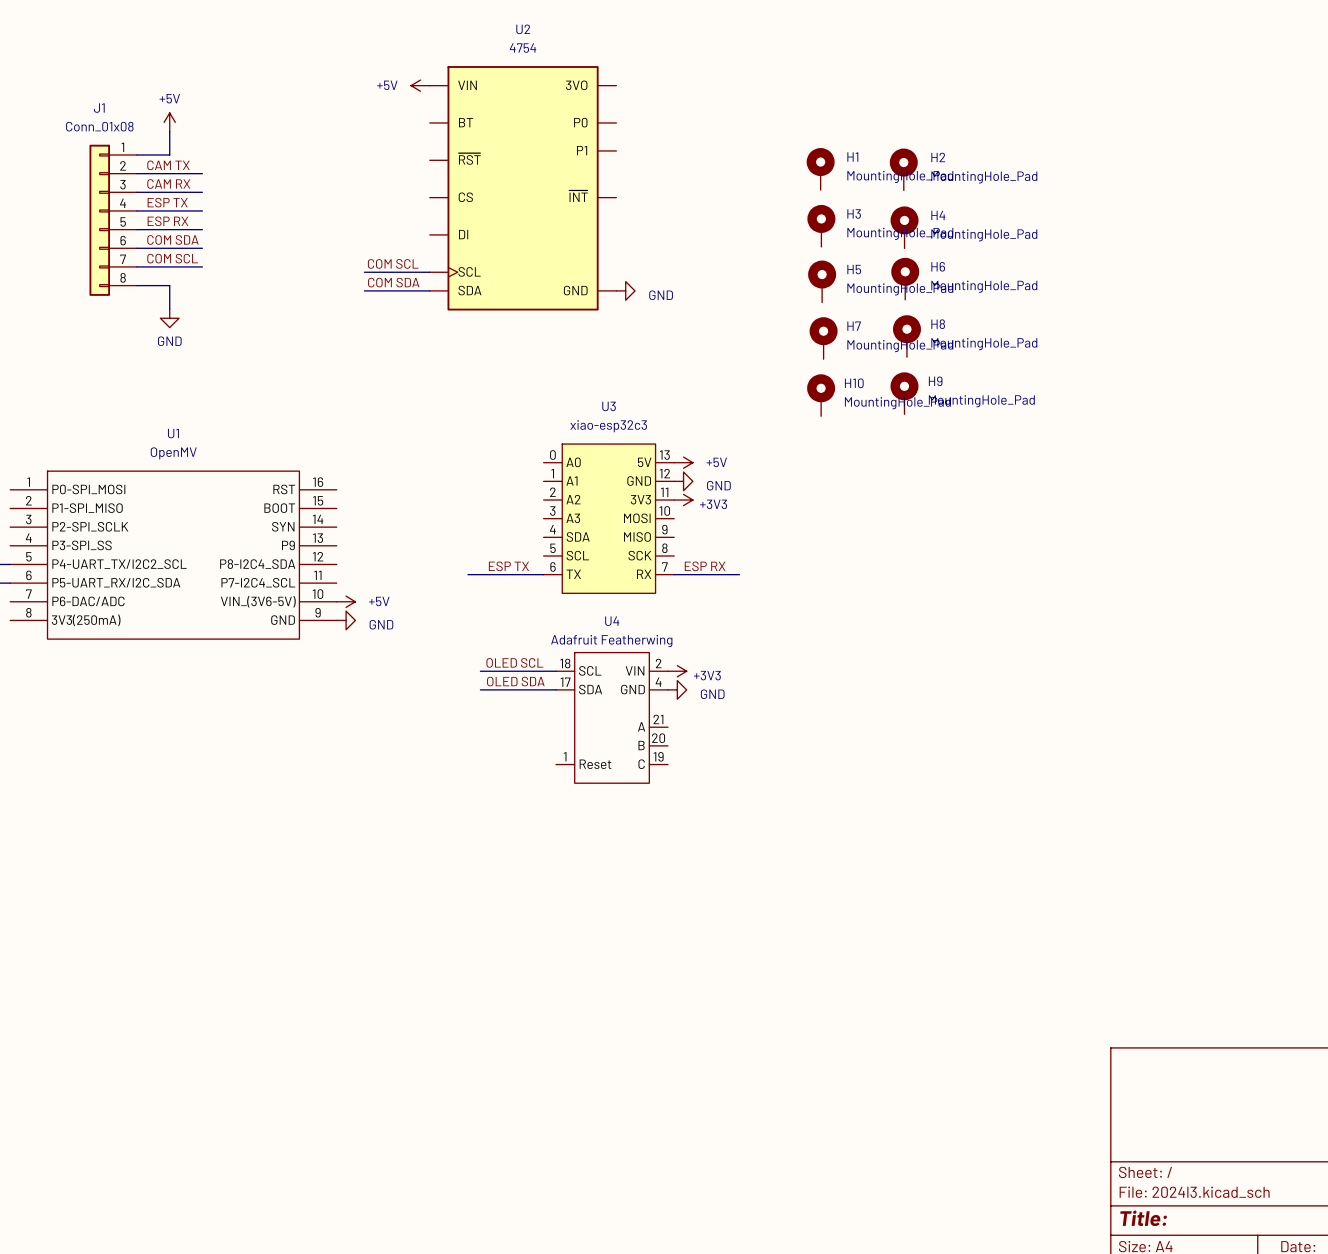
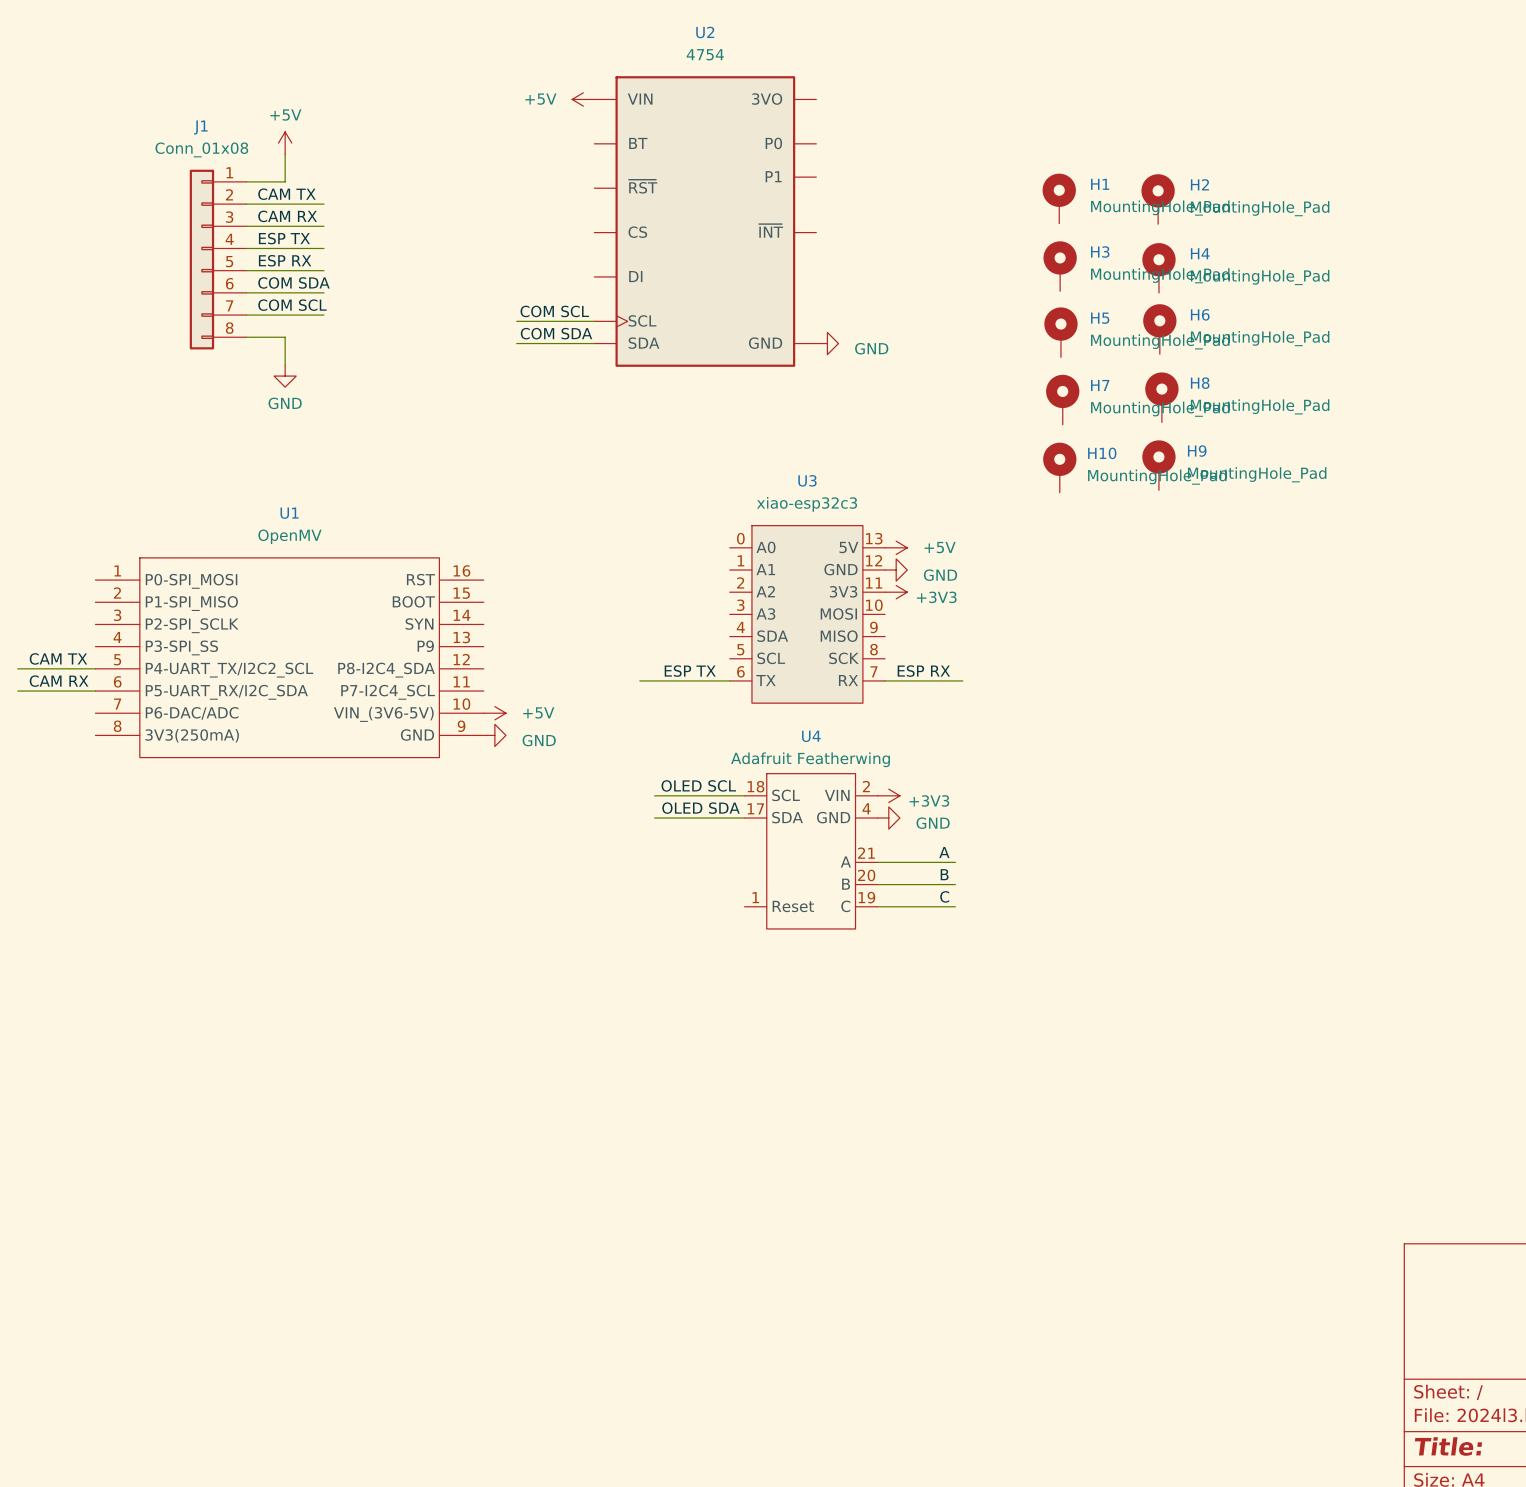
label: none -> A (944, 852)
wire: none -> (877, 862) (955, 862)
label: none -> B (944, 874)
wire: none -> (877, 884) (955, 884)
label: none -> C (944, 896)
wire: none -> (877, 906) (955, 906)

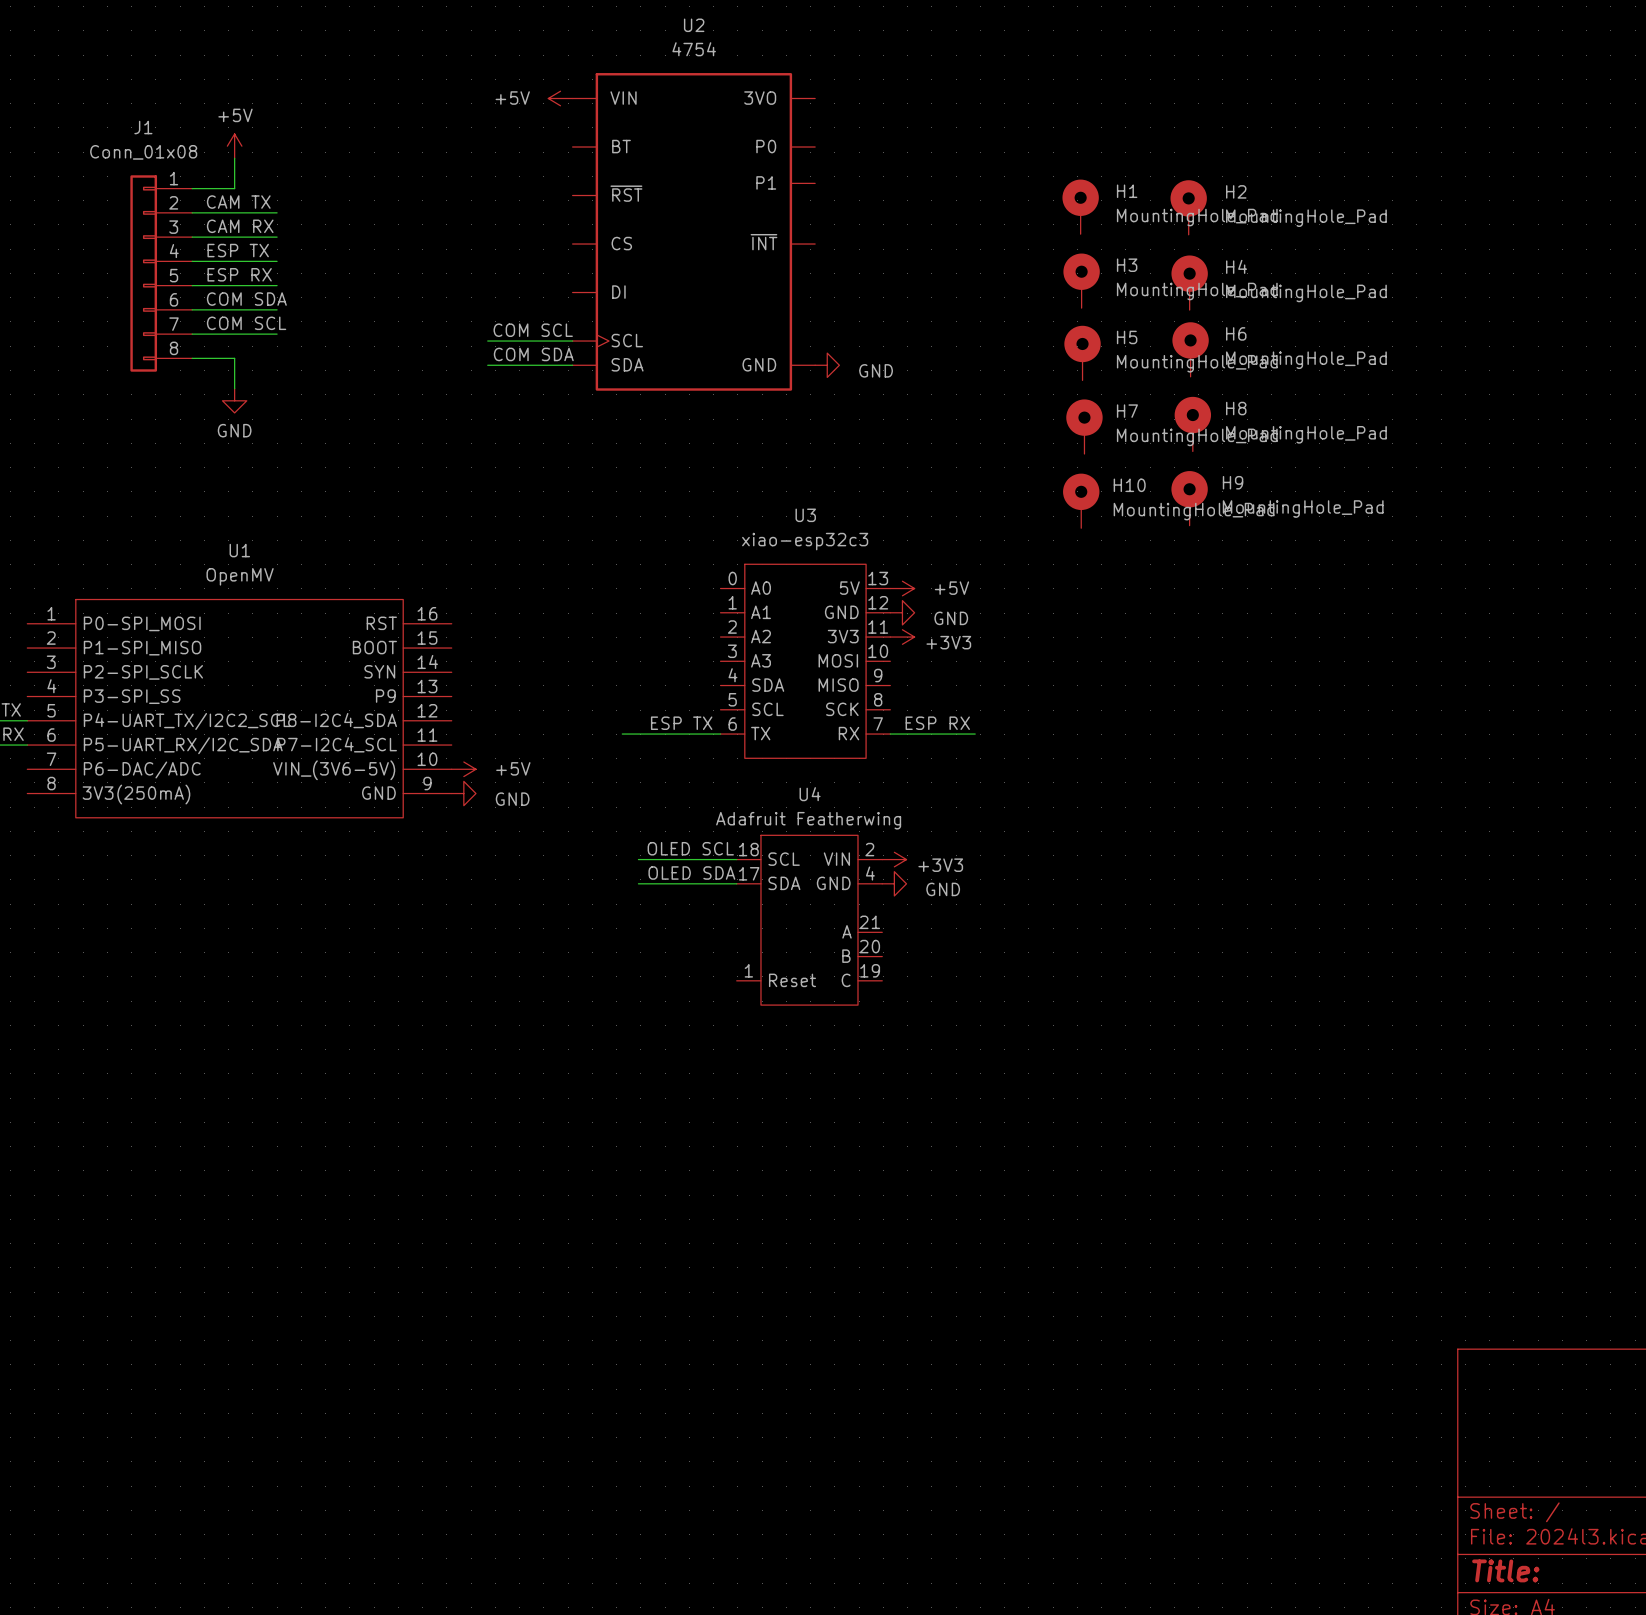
label: A (944, 852) -> none
wire: (877, 862) (955, 862) -> none
label: B (944, 874) -> none
wire: (877, 884) (955, 884) -> none
label: C (944, 896) -> none
wire: (877, 906) (955, 906) -> none

